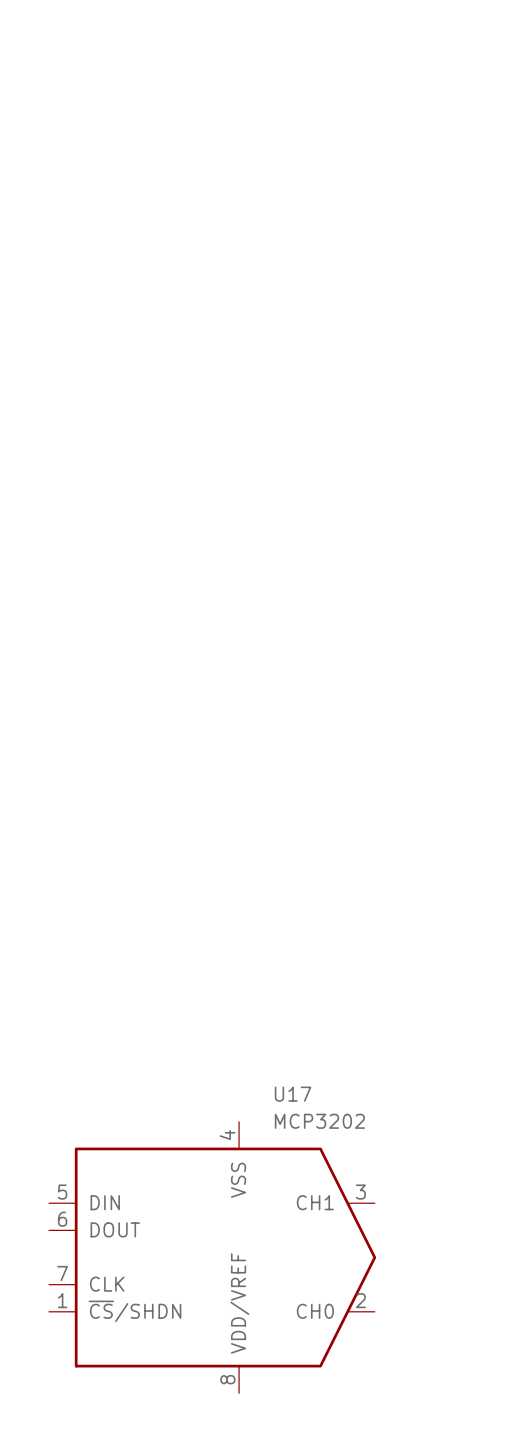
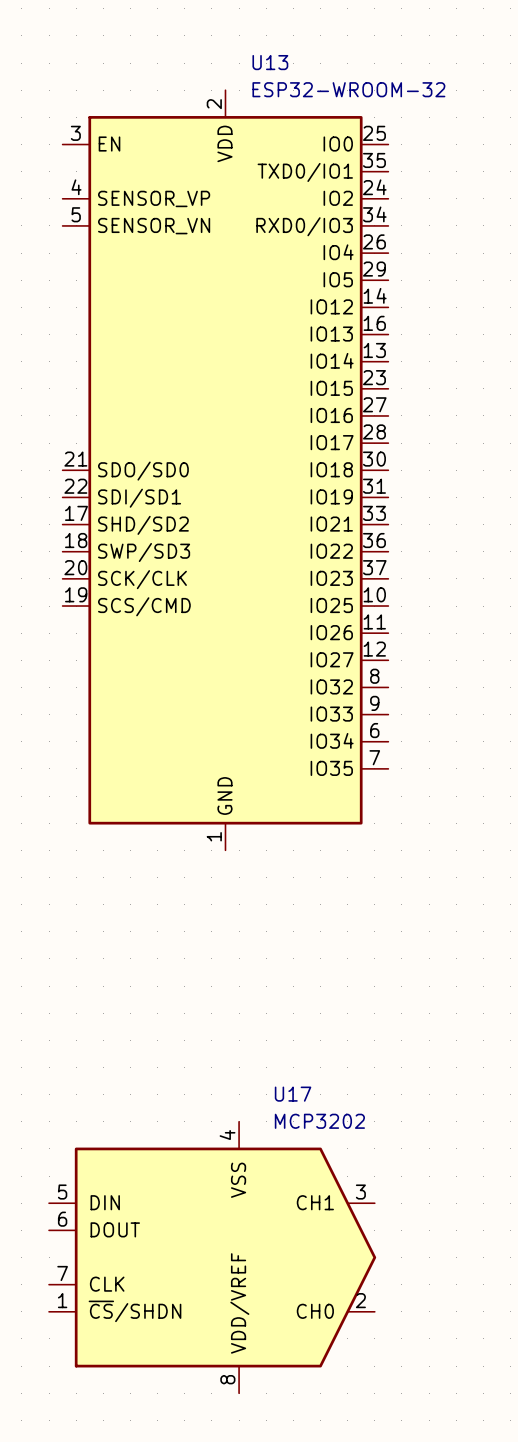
U13: none -> ESP32-WROOM-32 (225, 470)

